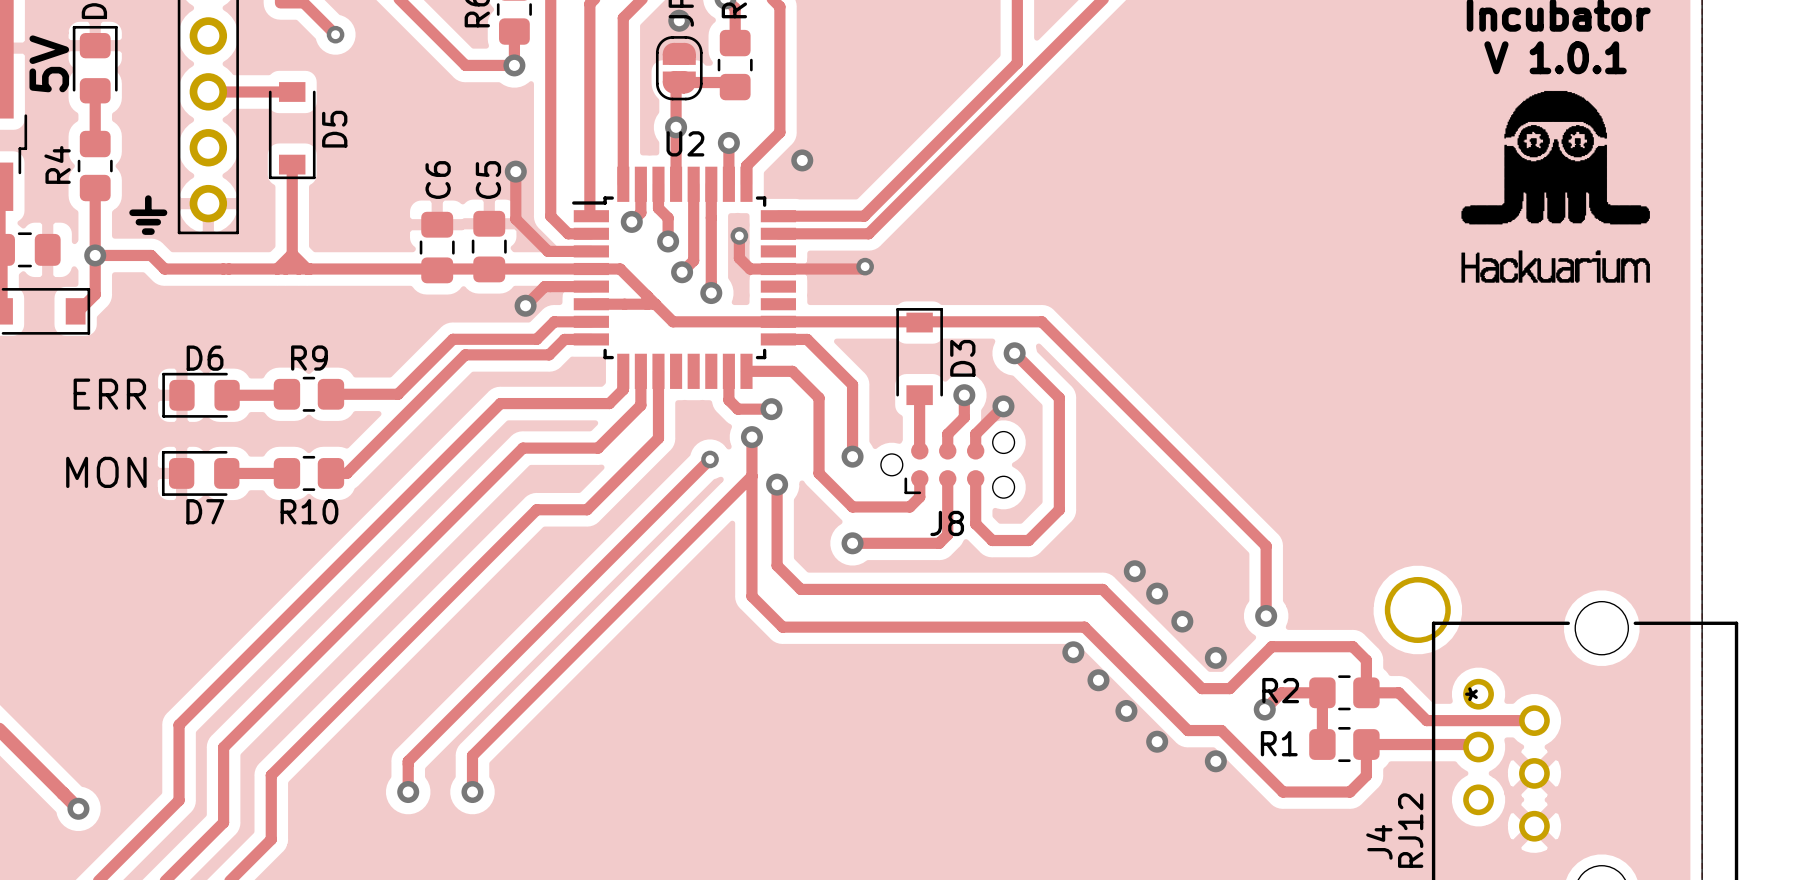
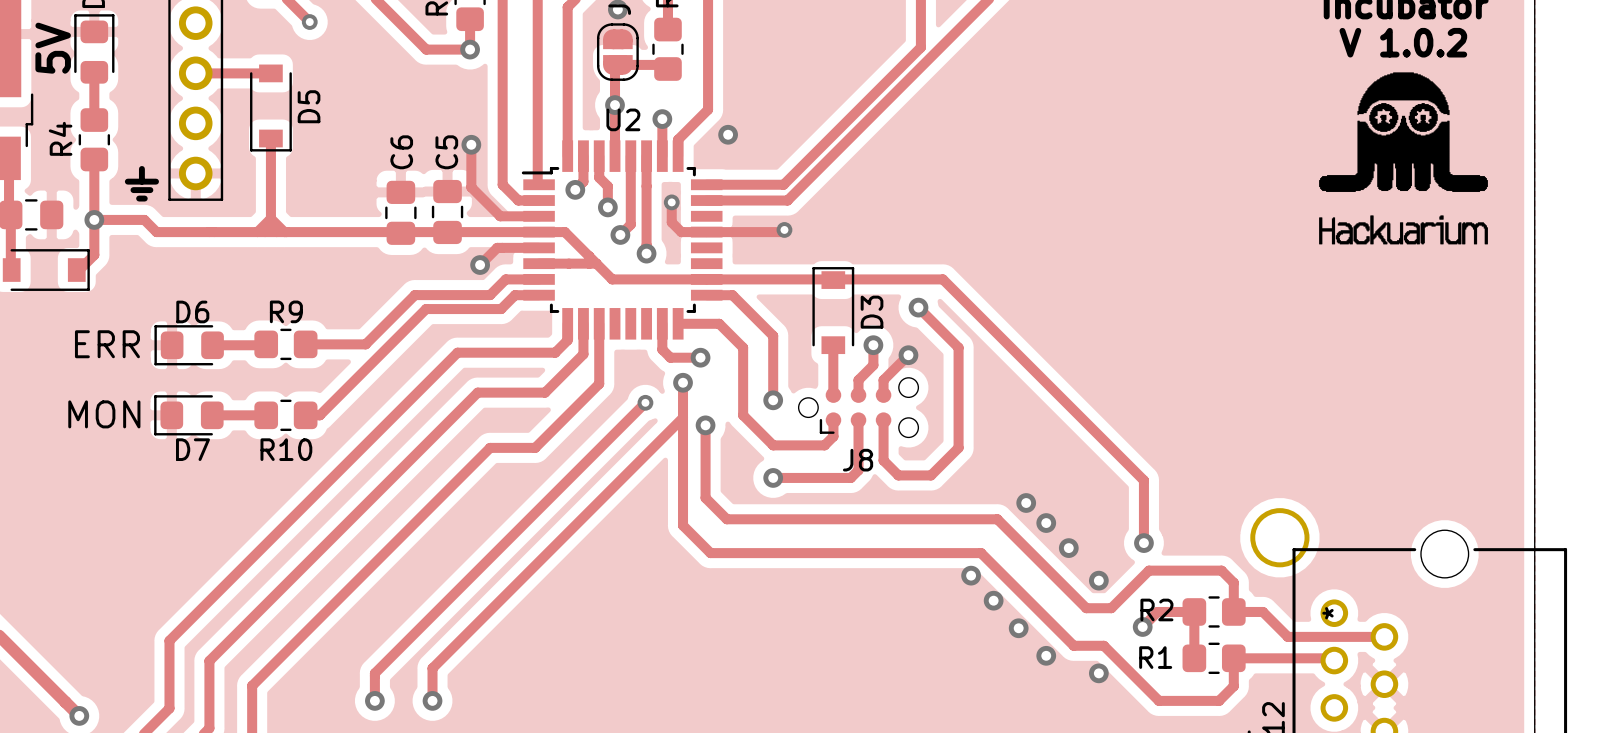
text: V 1.0.1 (1555, 57) -> V 1.0.2 (1403, 42)

